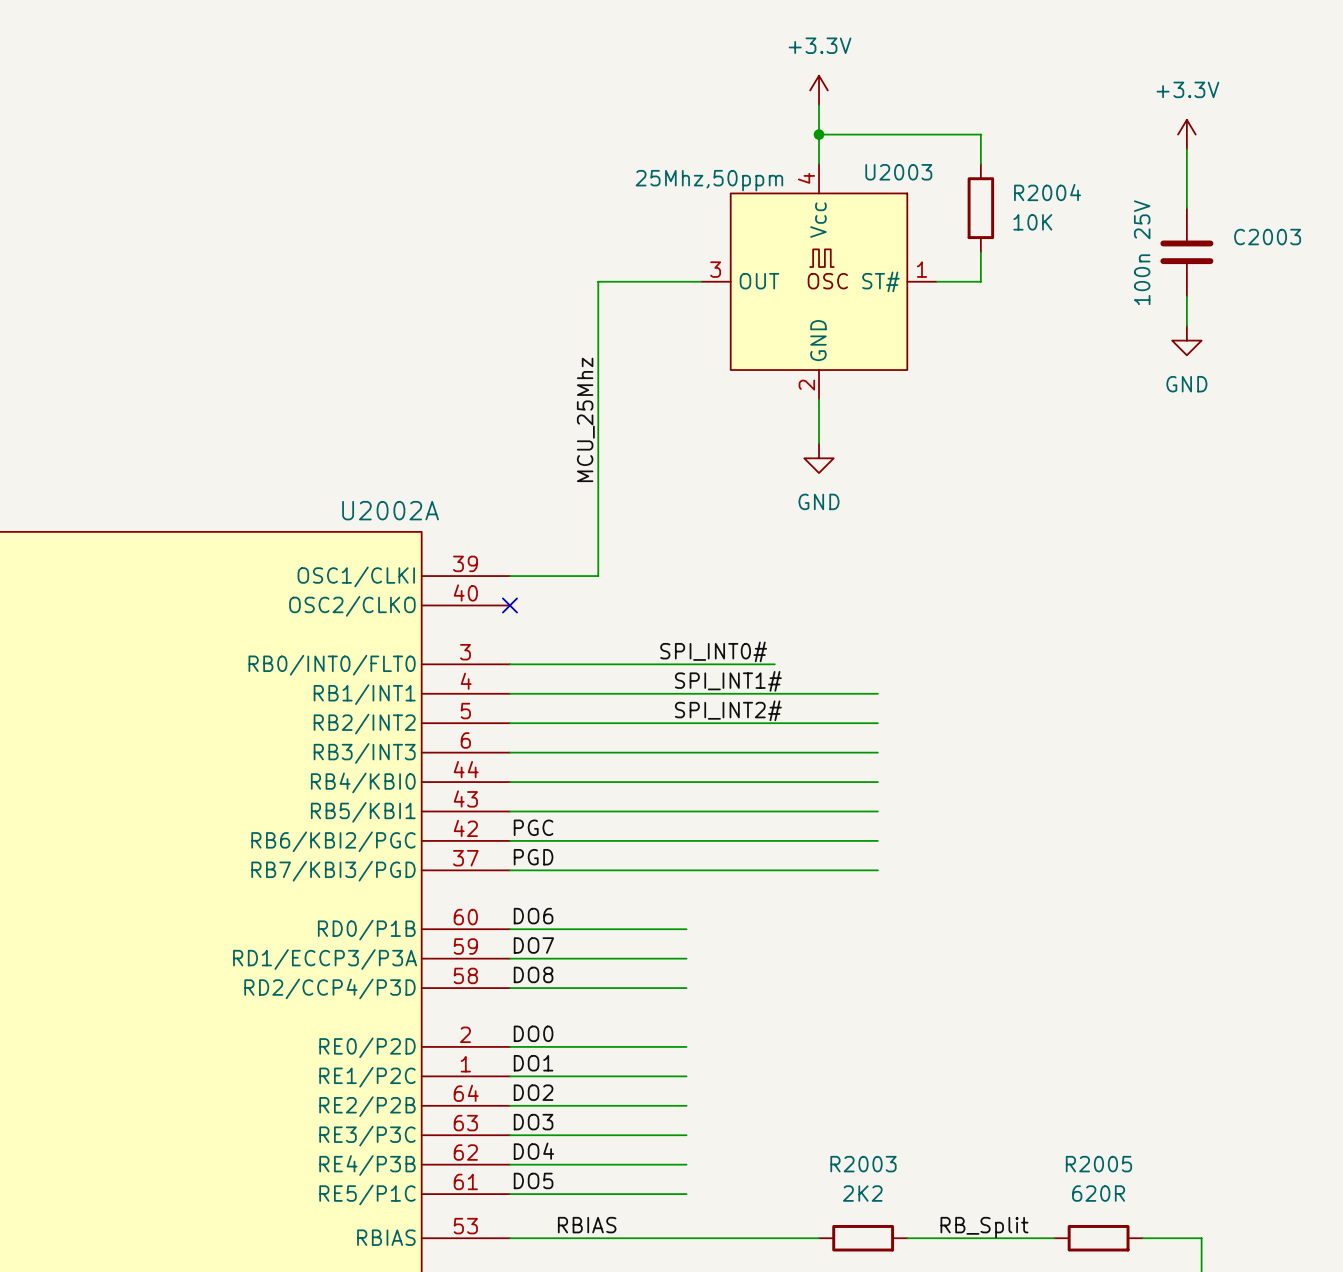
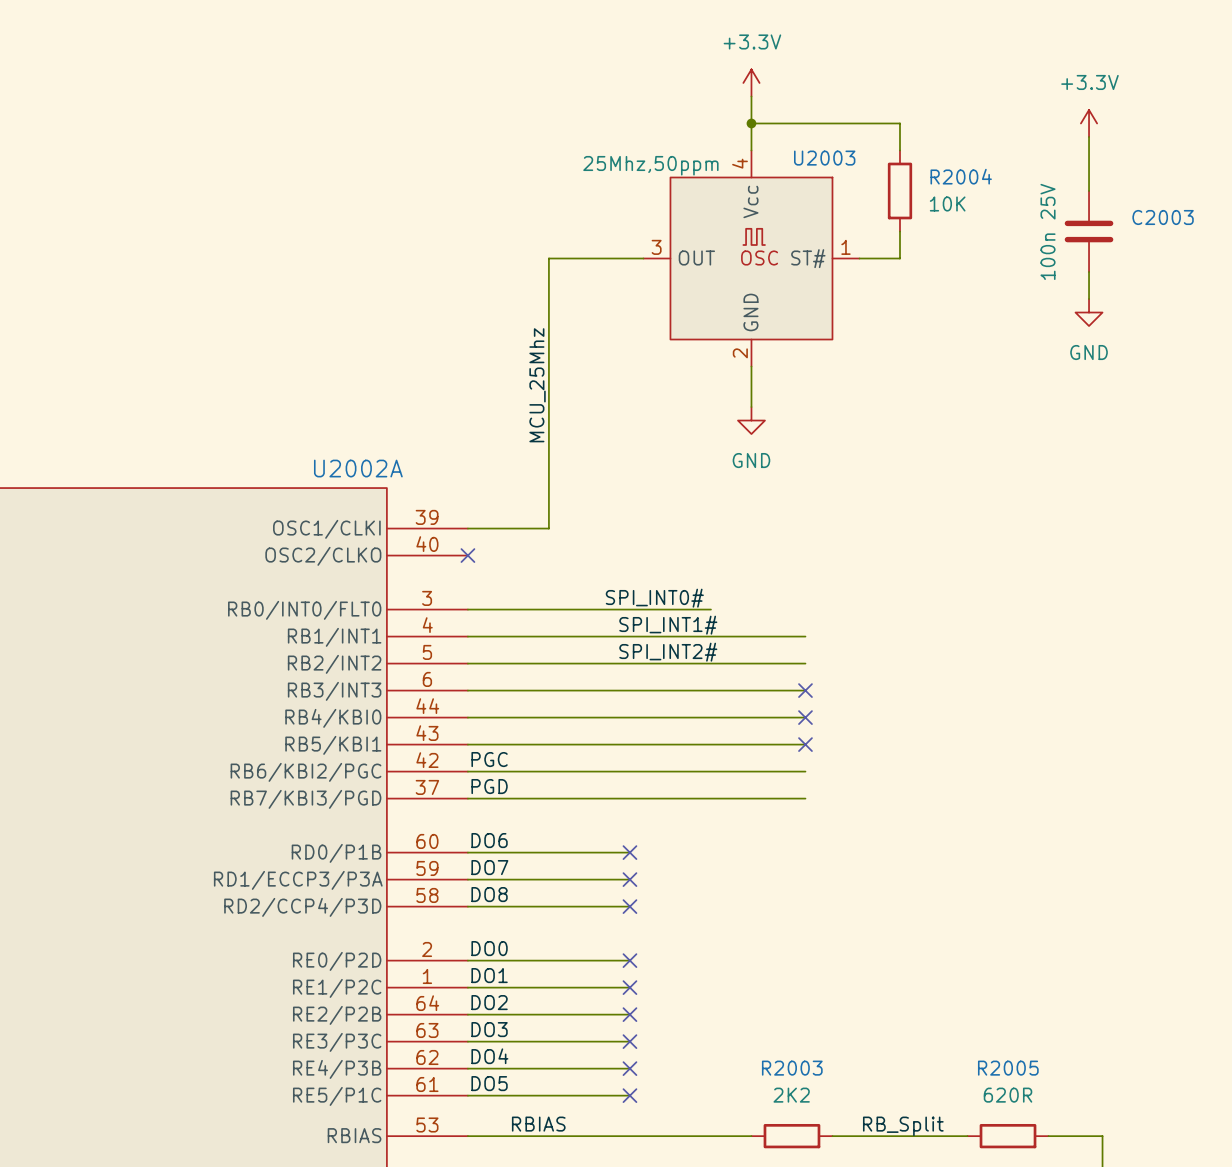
no-connect mark: none -> (805, 690)
no-connect mark: none -> (805, 717)
no-connect mark: none -> (805, 744)
no-connect mark: none -> (629, 852)
no-connect mark: none -> (629, 879)
no-connect mark: none -> (629, 906)
no-connect mark: none -> (629, 960)
no-connect mark: none -> (629, 987)
no-connect mark: none -> (629, 1014)
no-connect mark: none -> (629, 1041)
no-connect mark: none -> (629, 1068)
no-connect mark: none -> (629, 1095)

